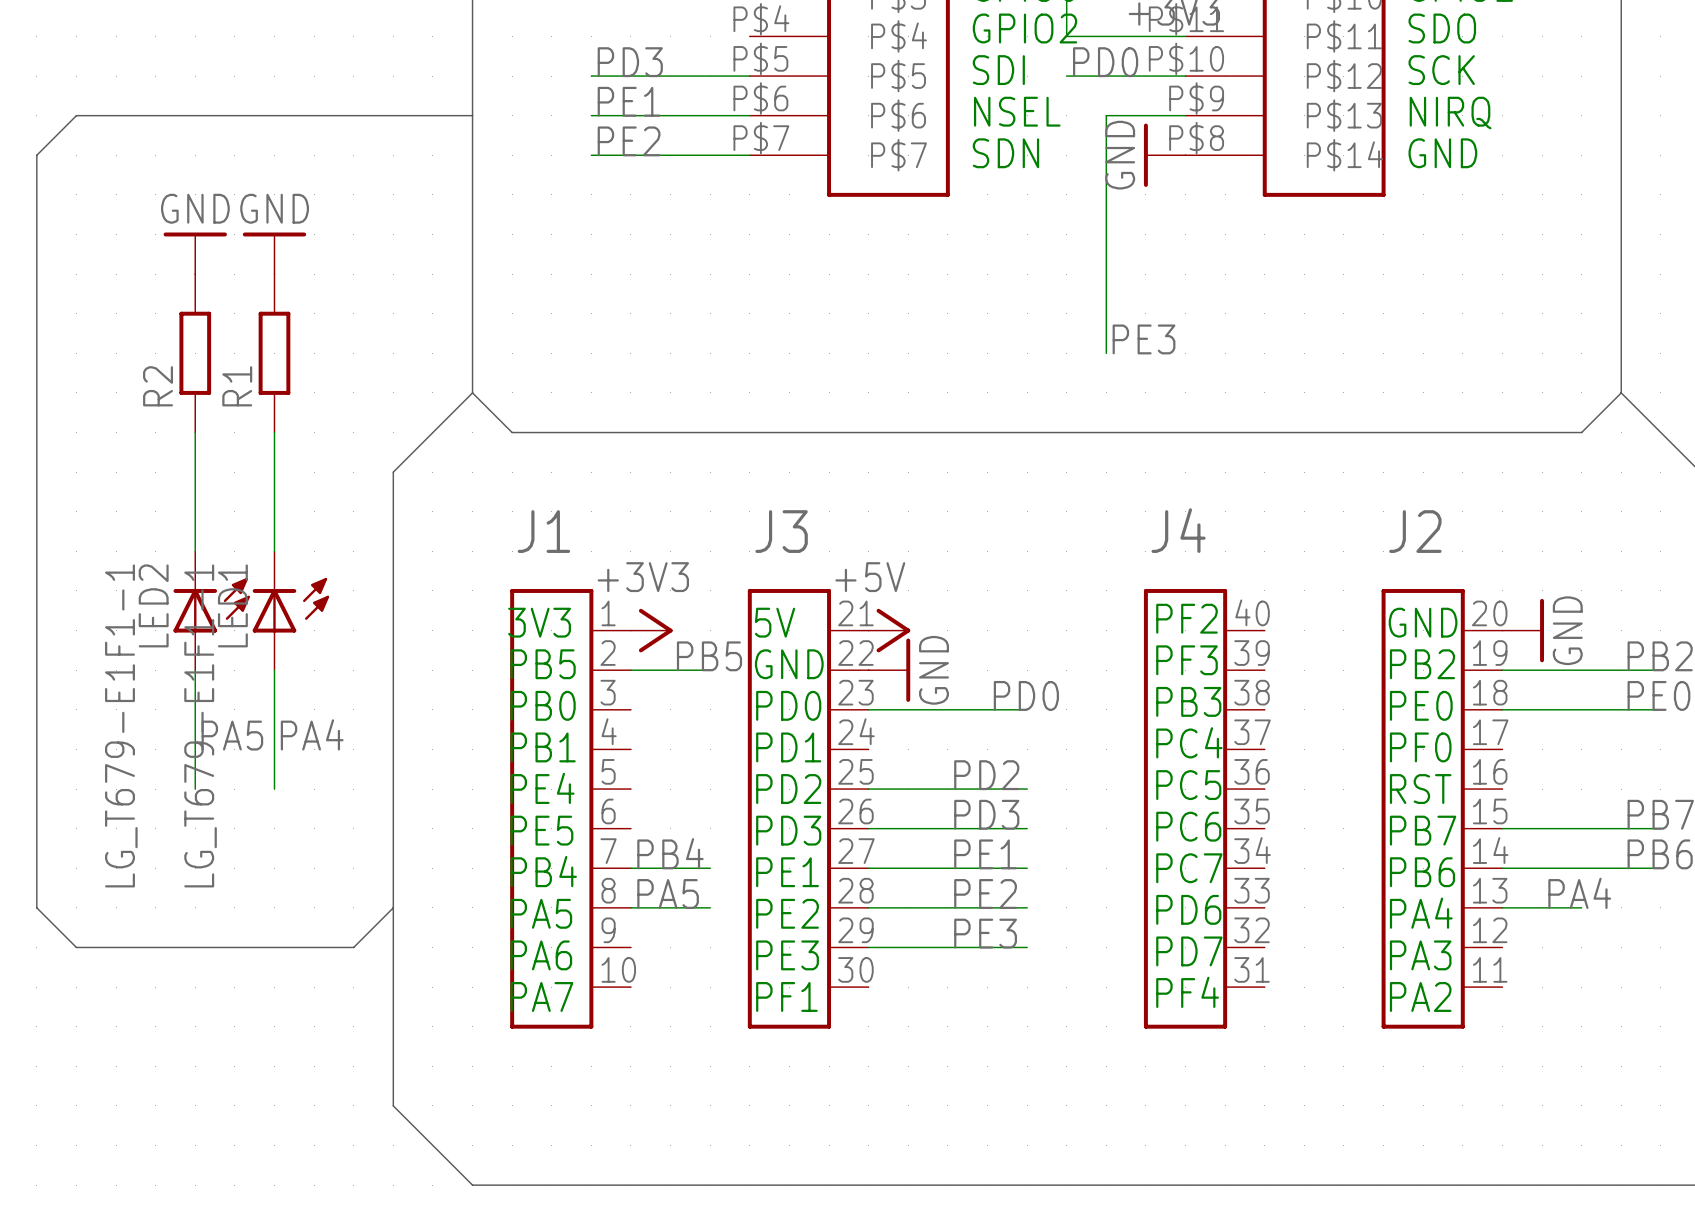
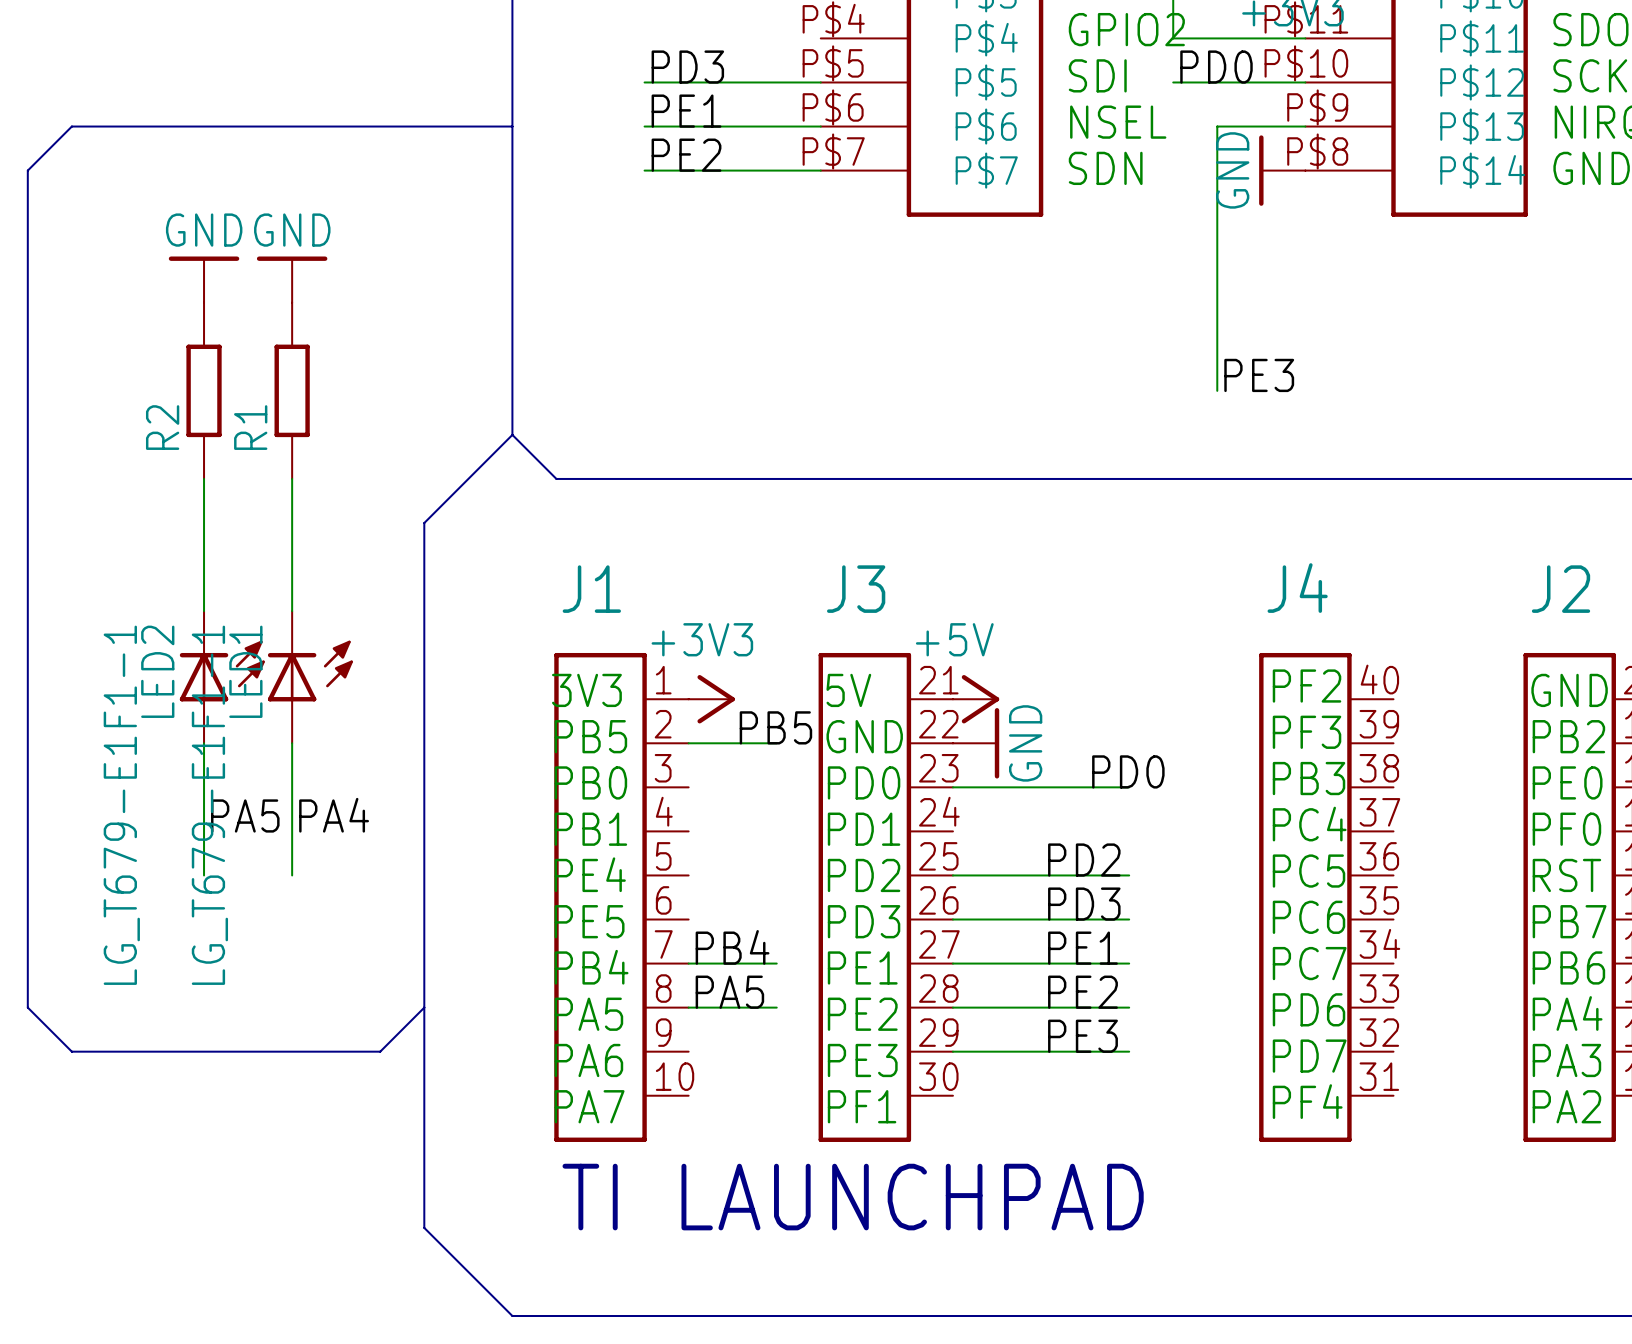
text: none -> TI LAUNCHPAD (853, 1197)

